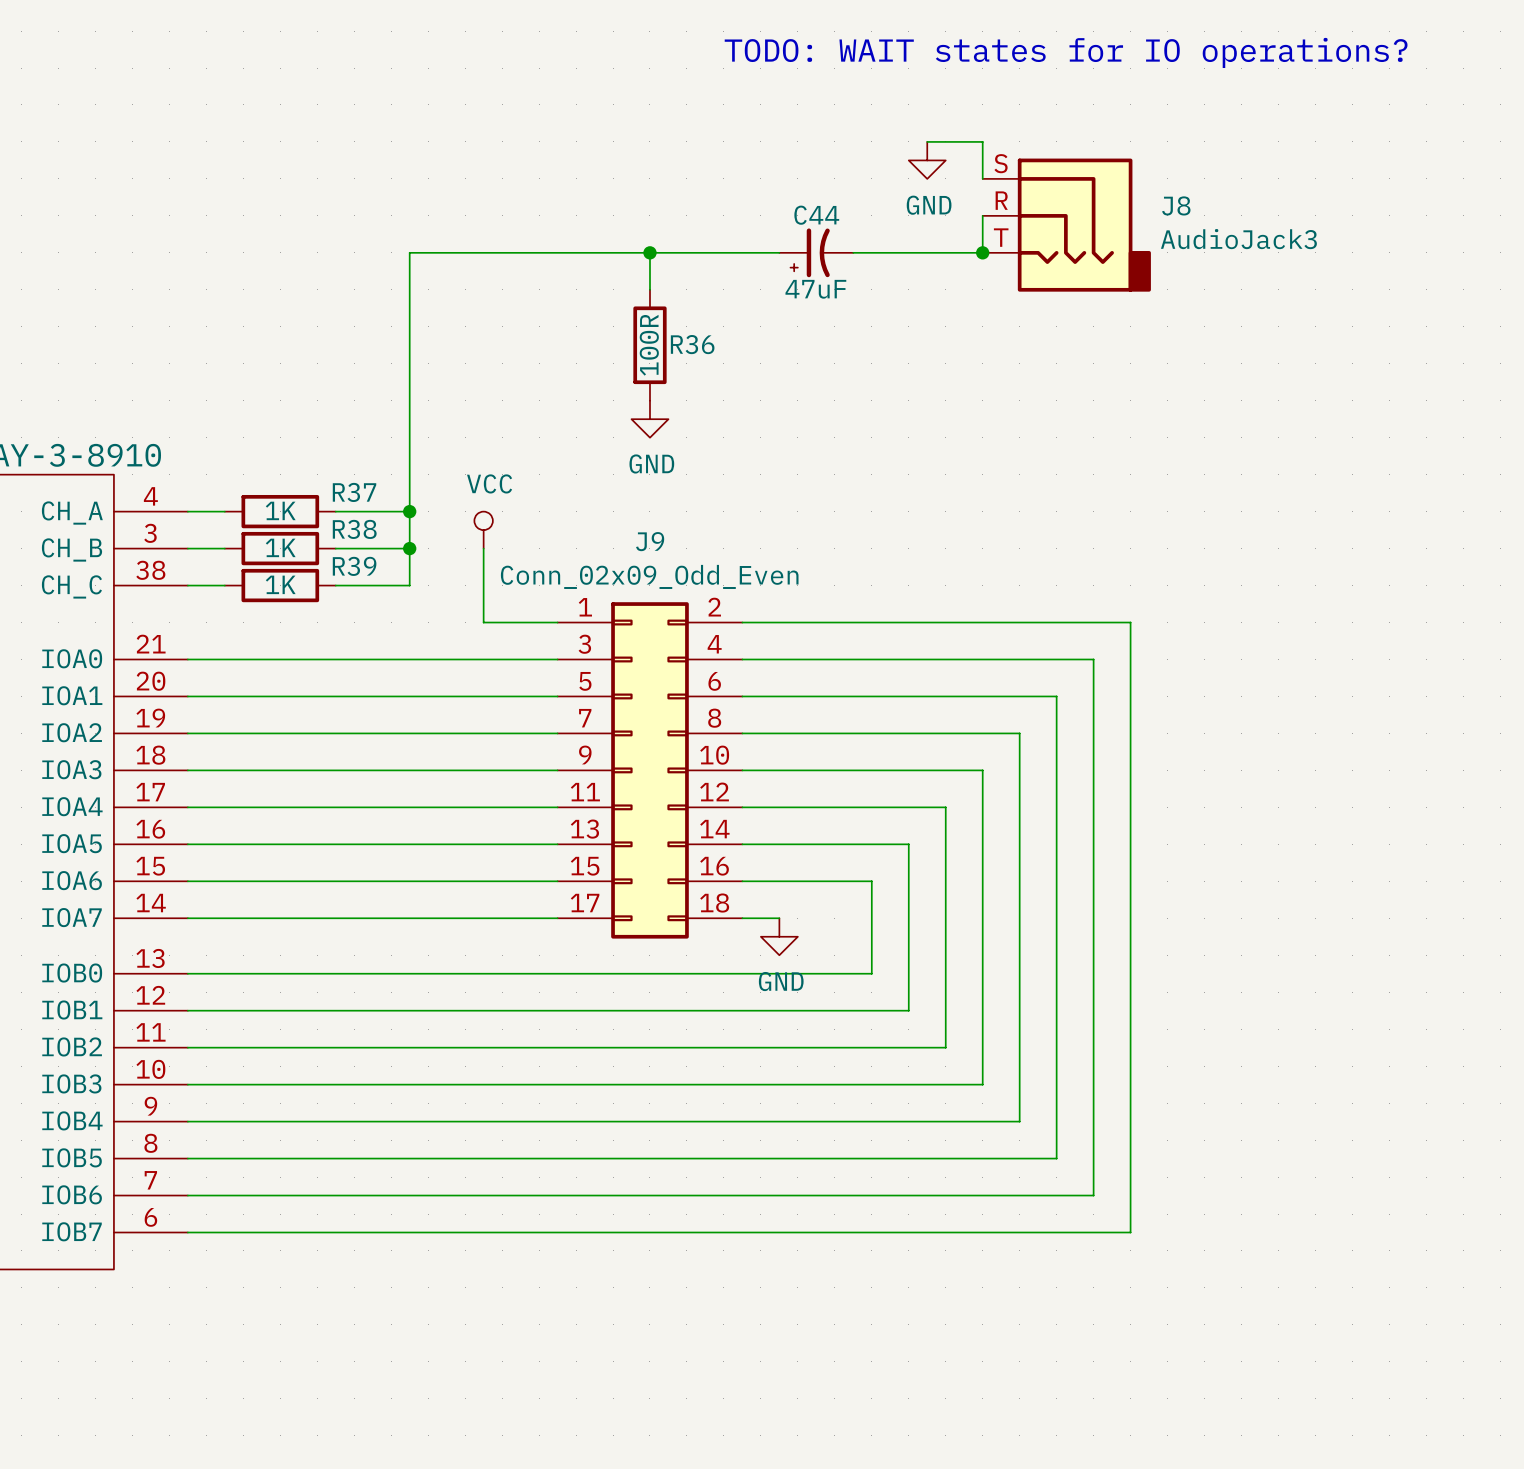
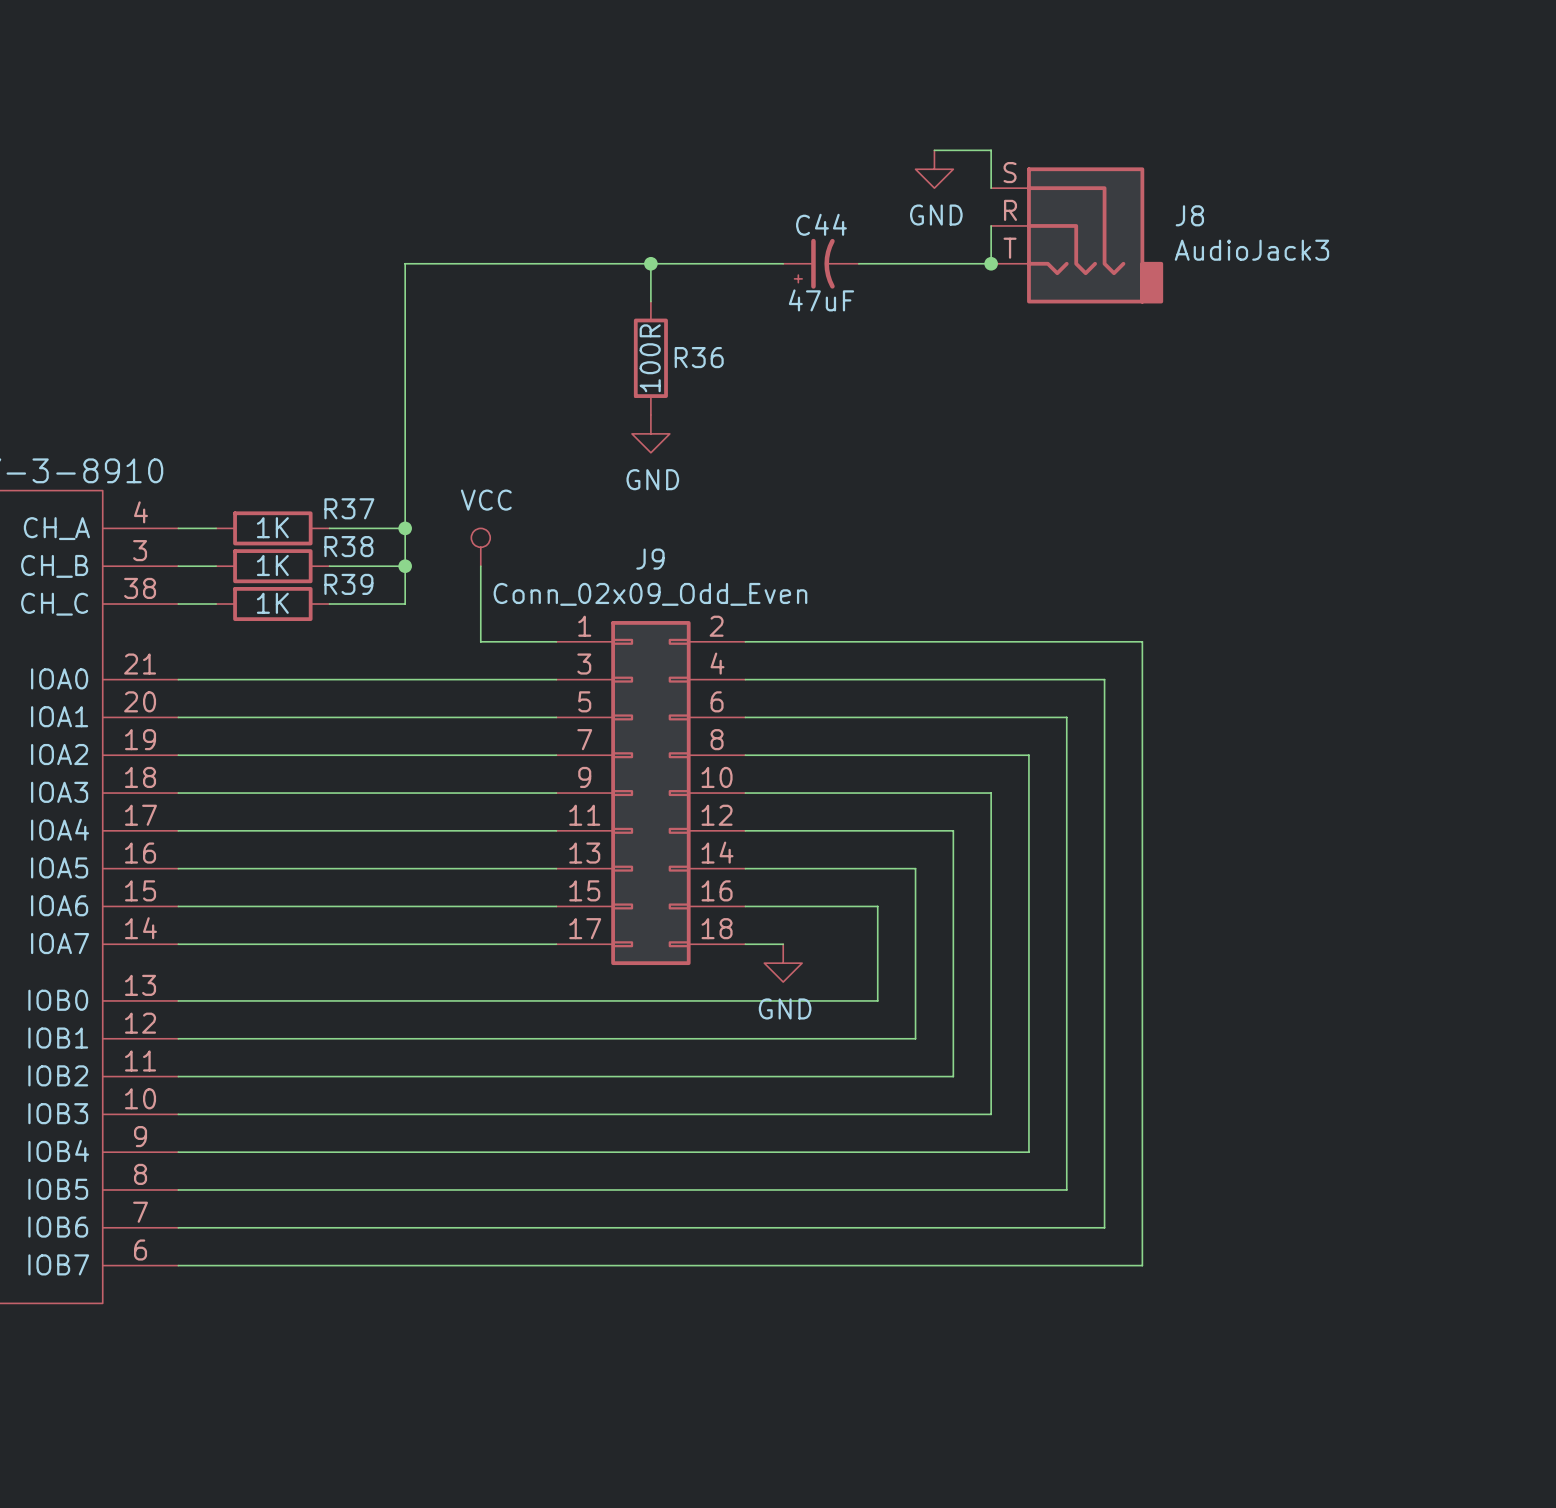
text: TODO: WAIT states for IO operations? (1066, 52) -> none

